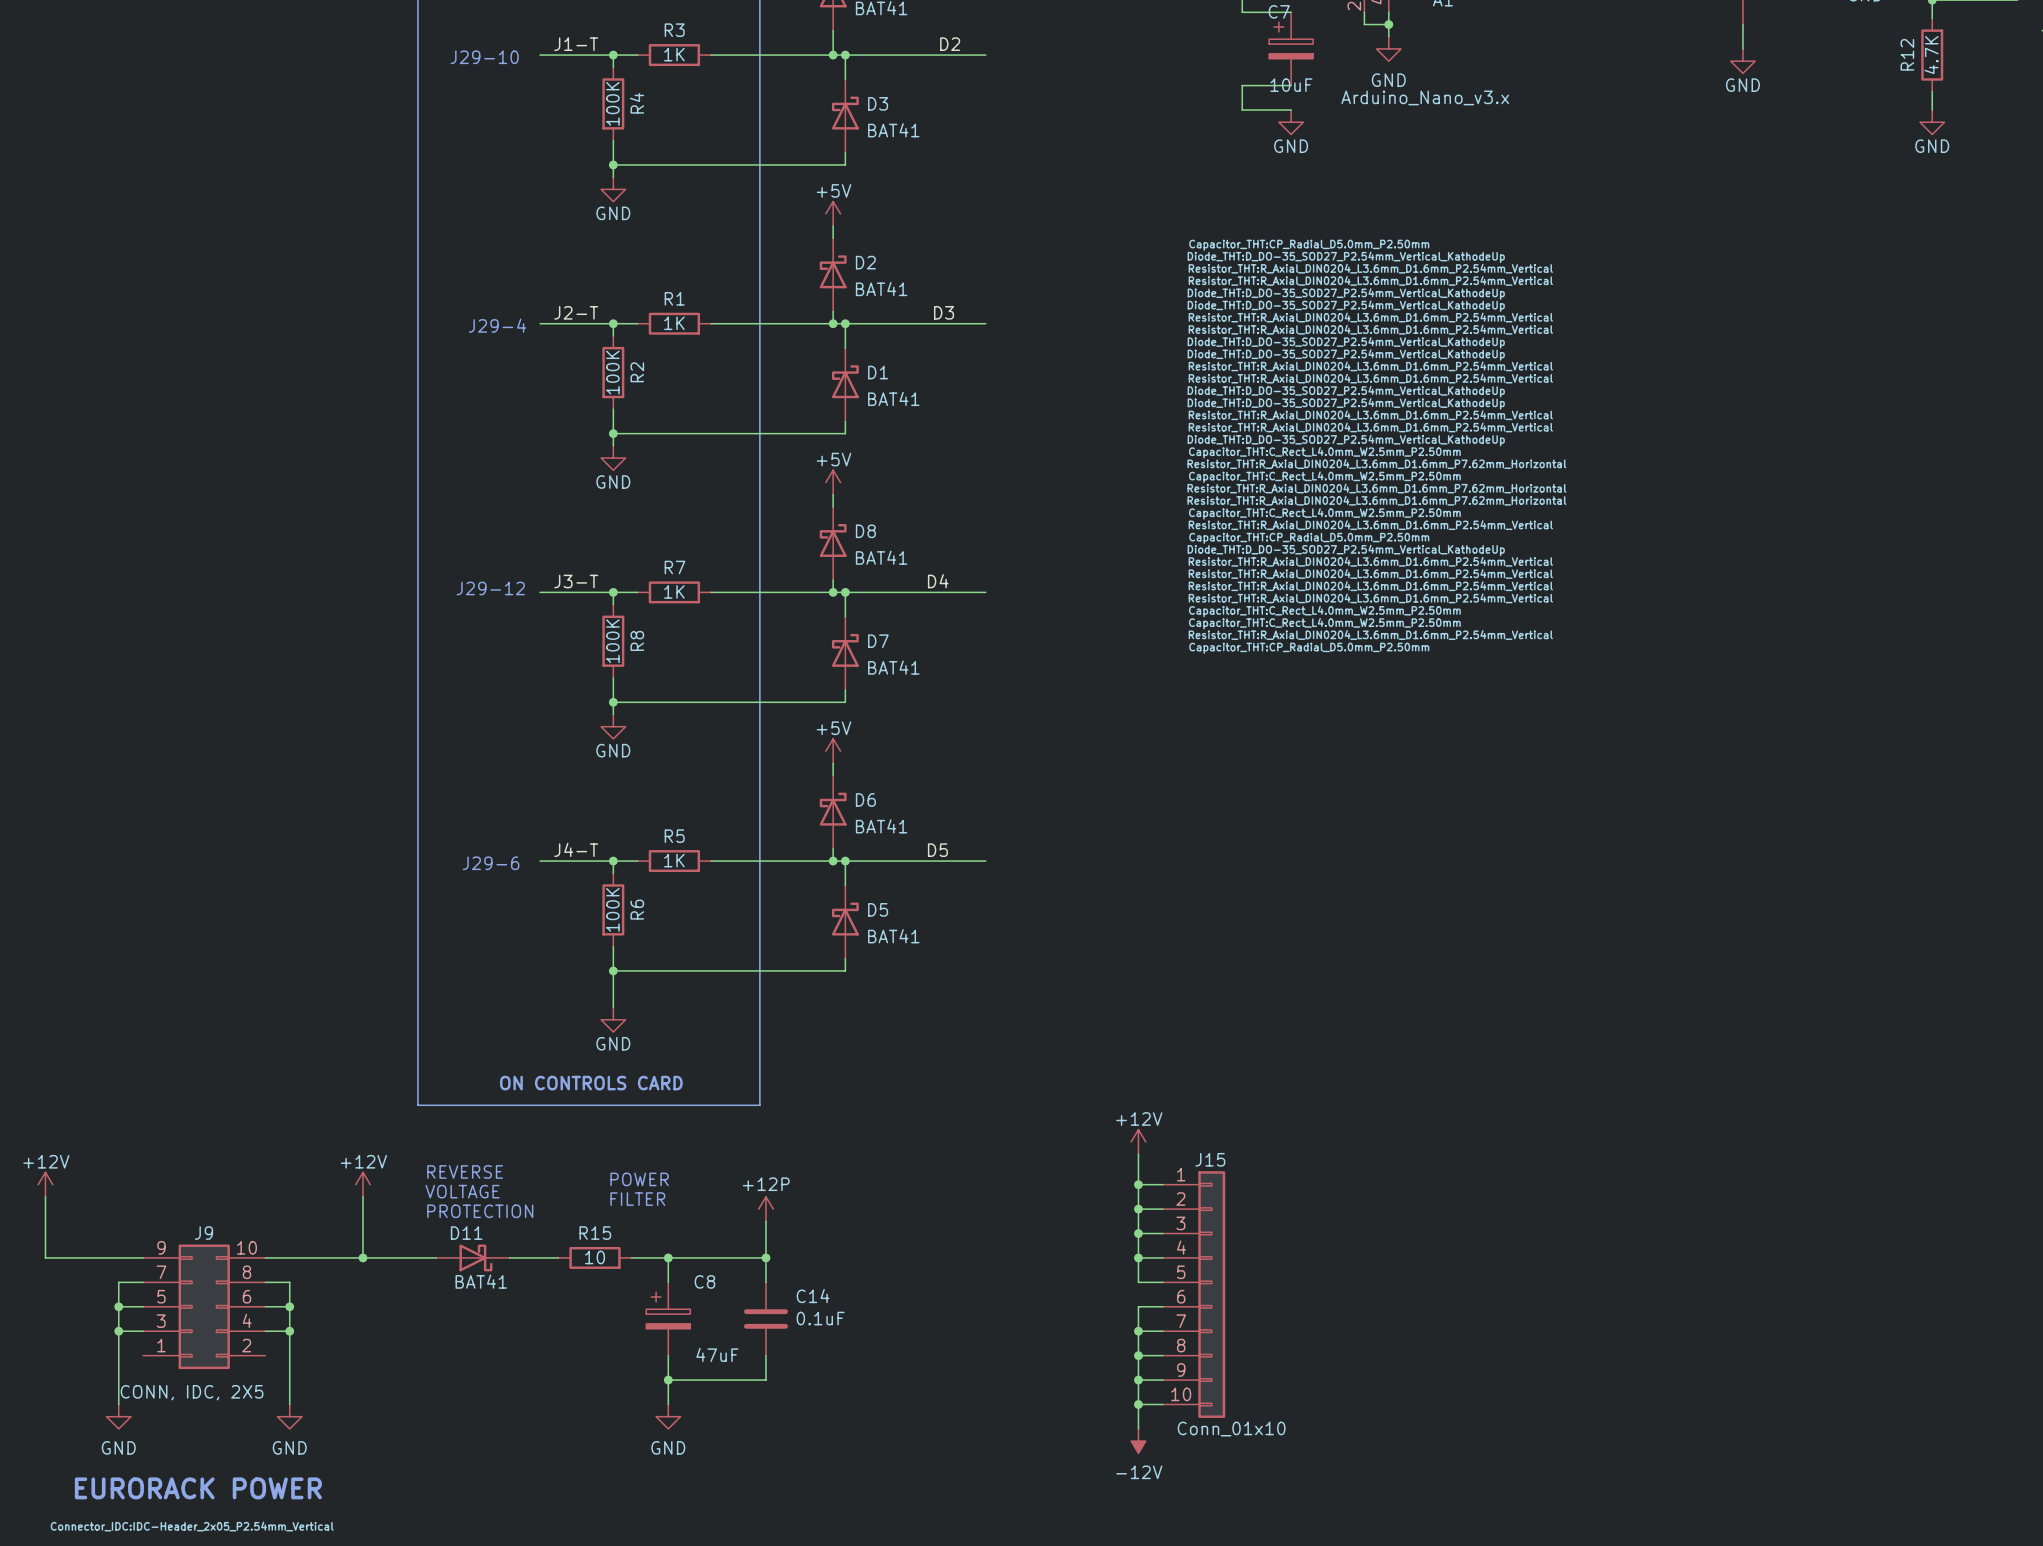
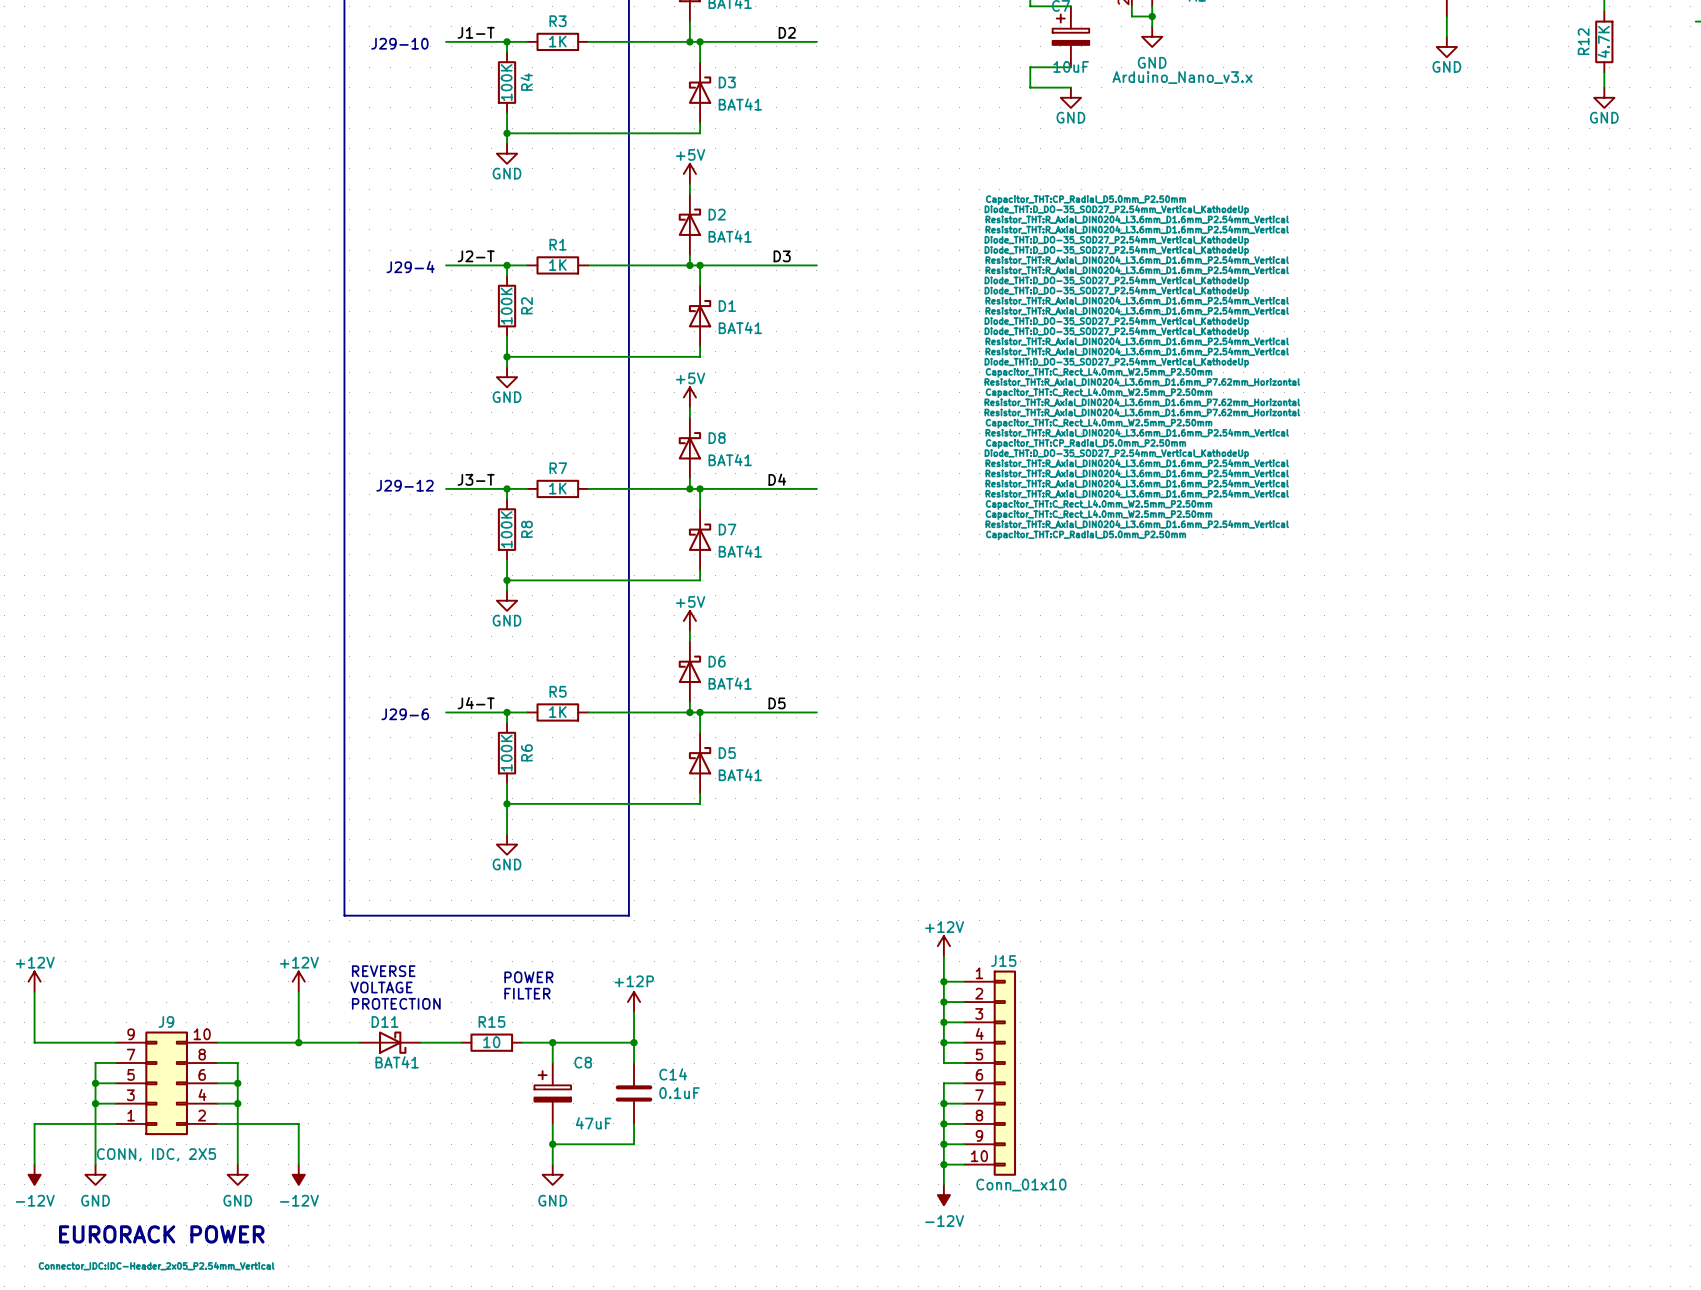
text: ON CONTROLS CARD (591, 1083) -> none
wire: none -> (115, 1123) (34, 1123) (34, 1164)
wire: none -> (217, 1123) (298, 1123) (298, 1164)
power symbol: none -> -12V (34, 1174)
power symbol: none -> -12V (298, 1174)

